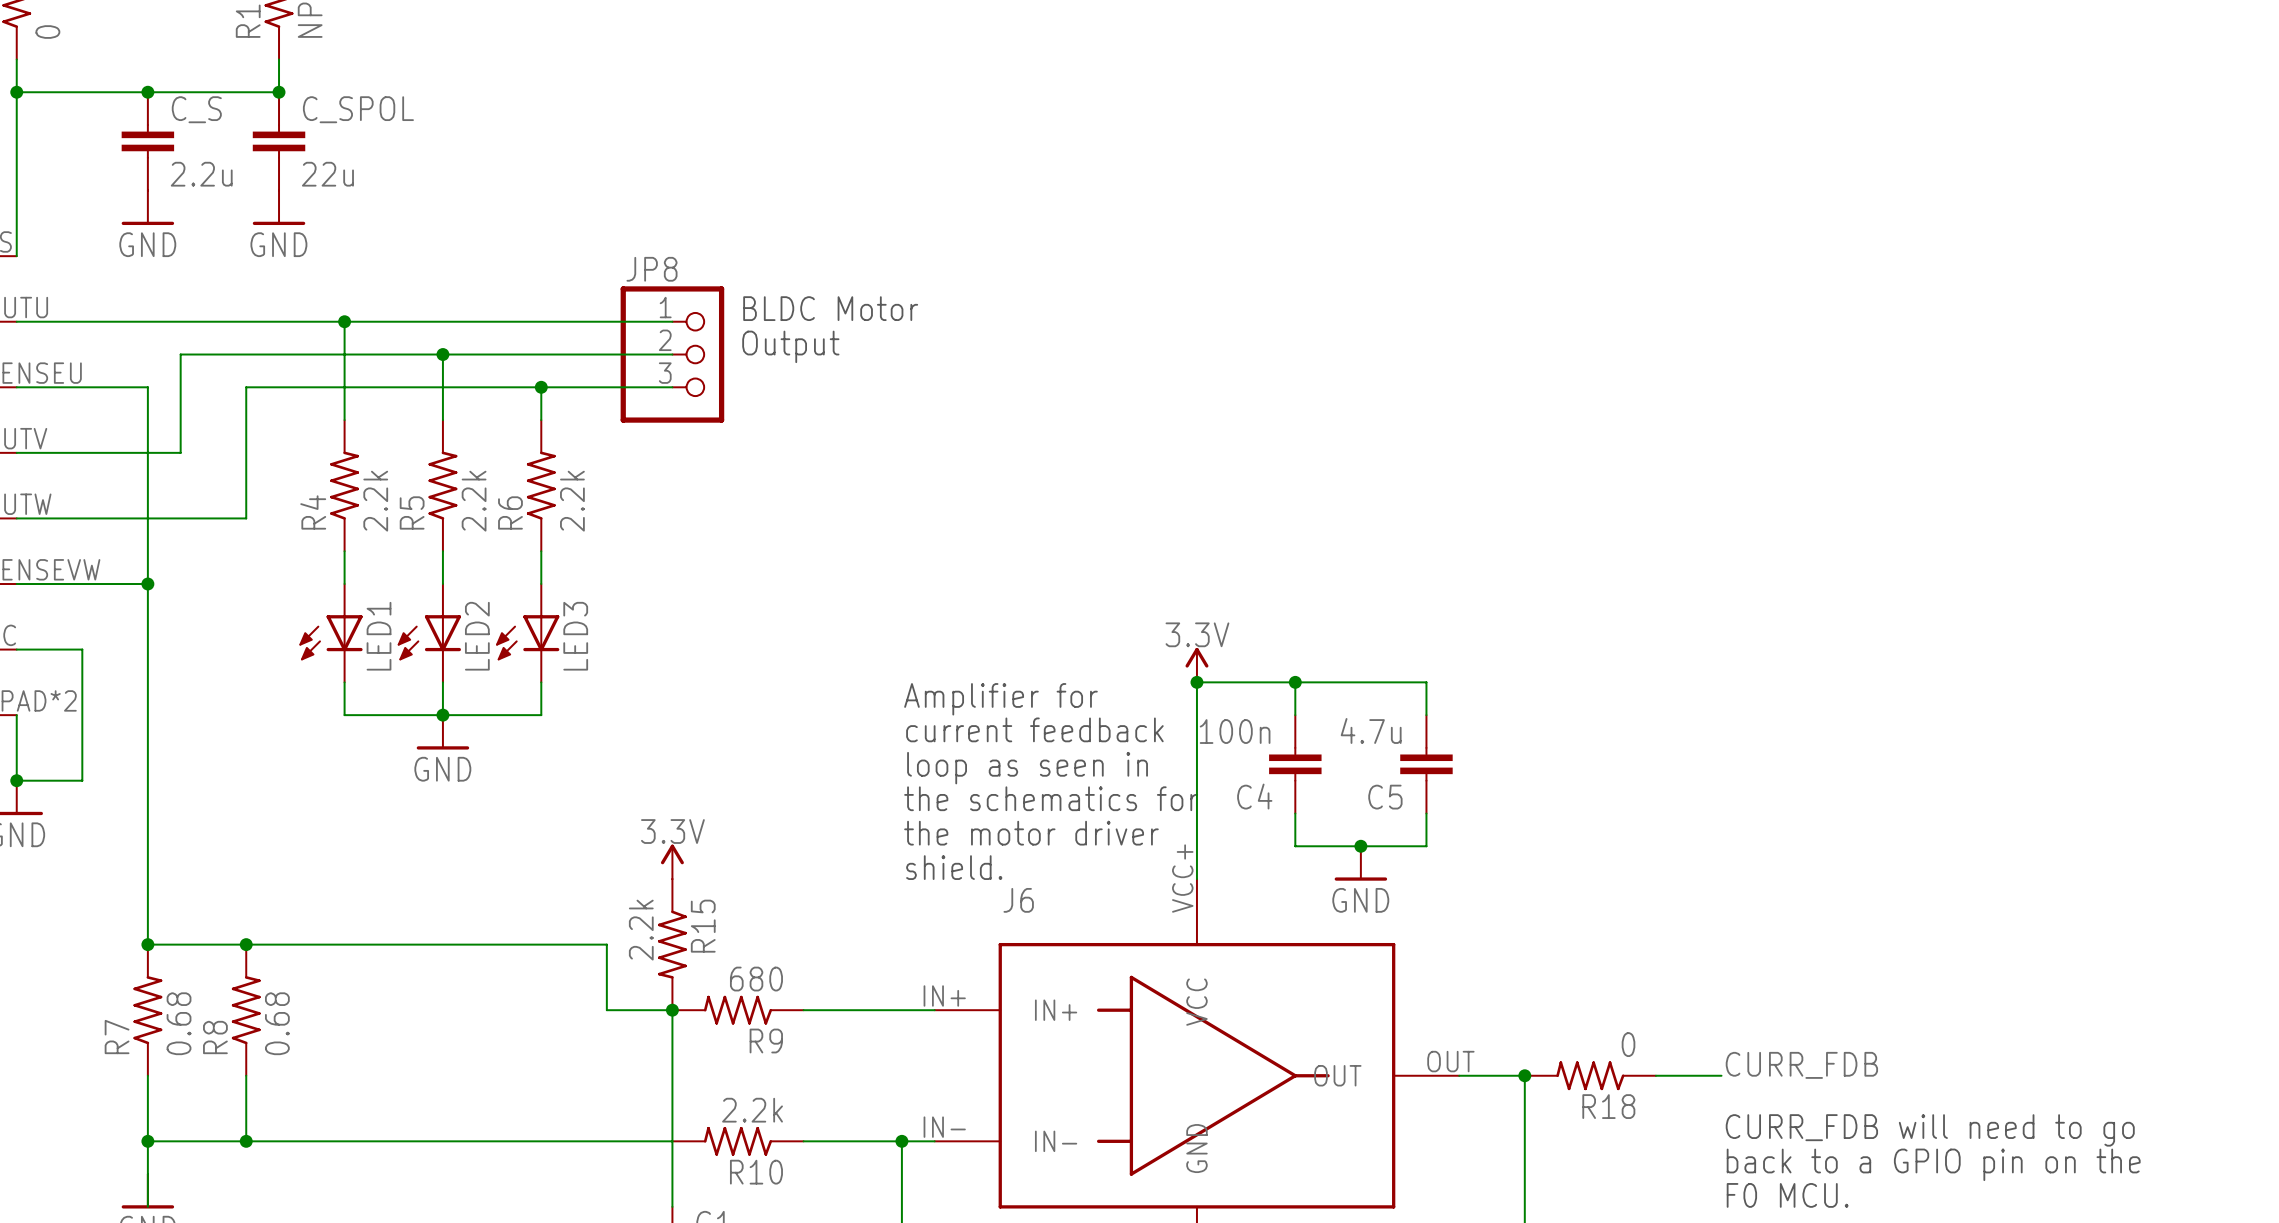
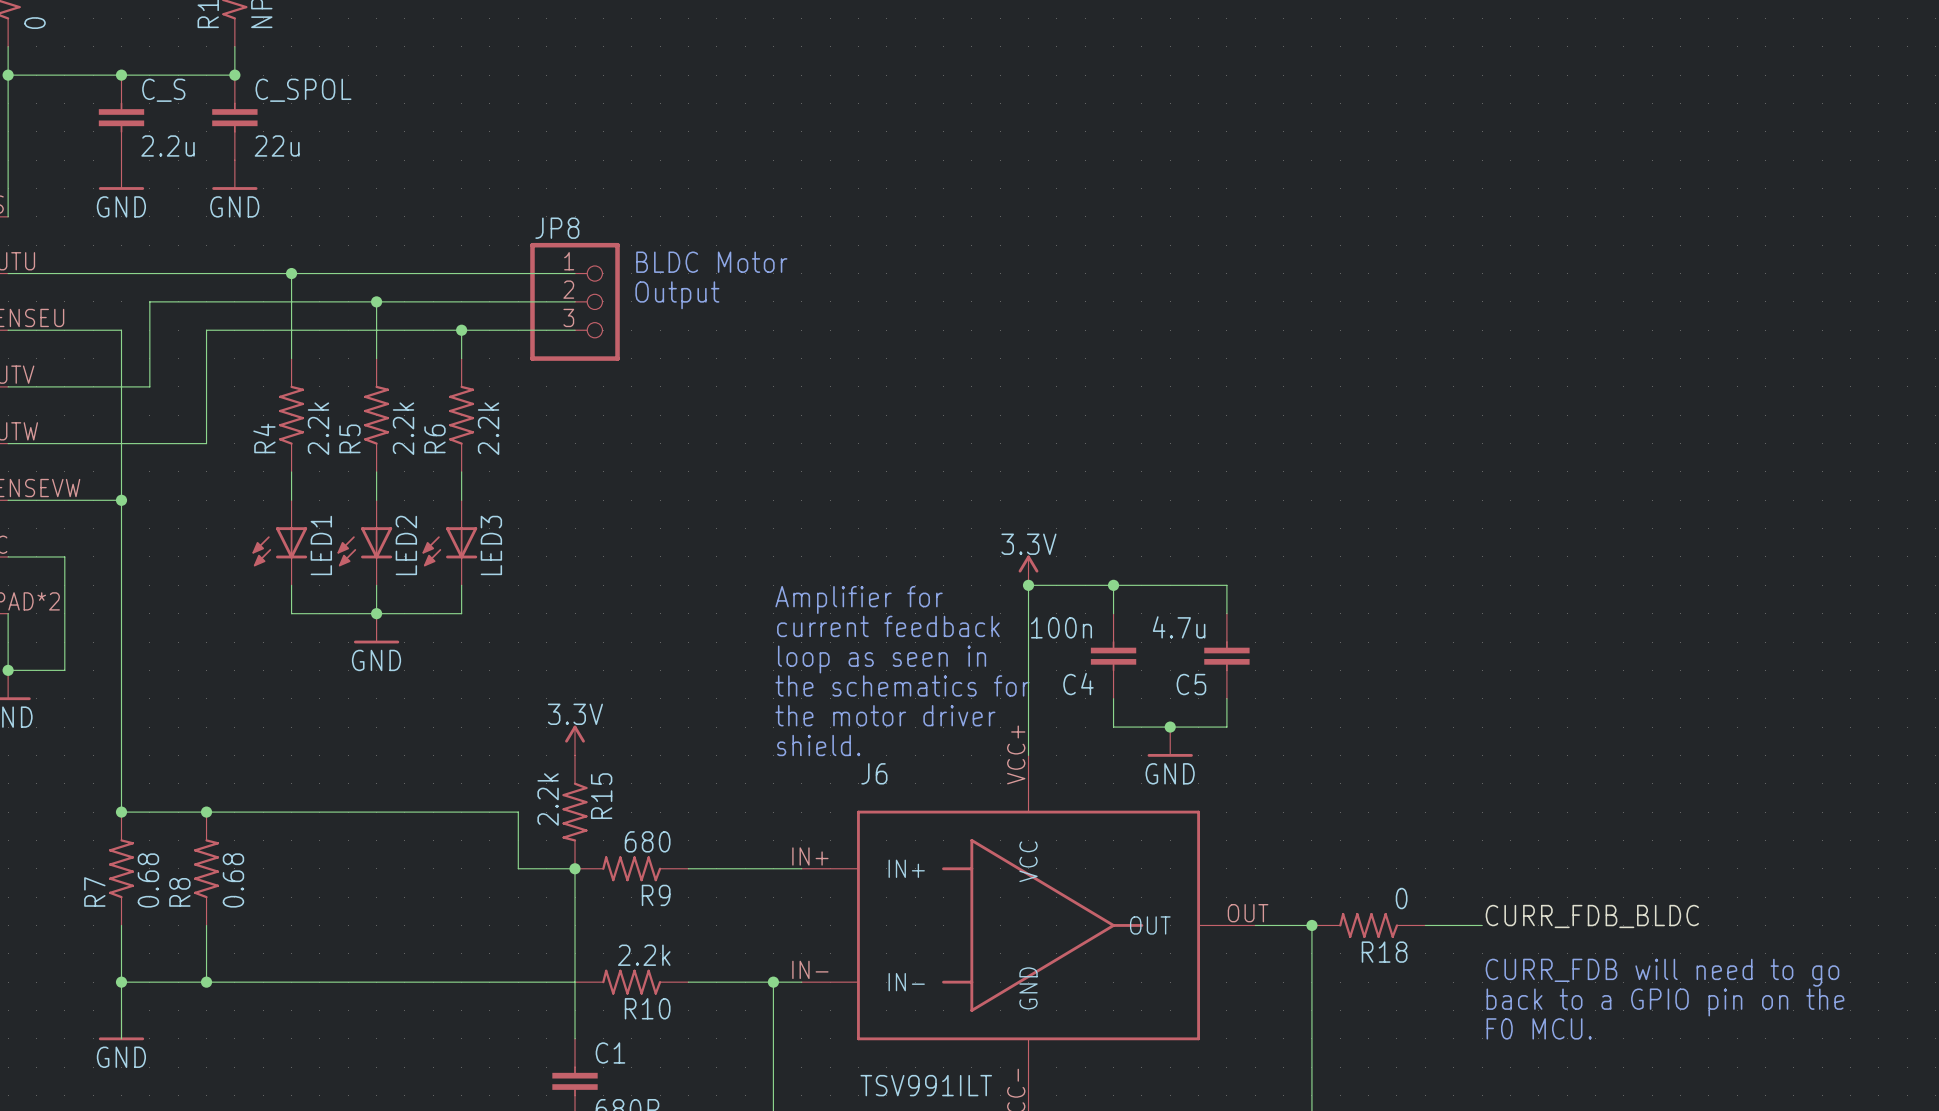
label: CURR_FDB (1801, 1065) -> CURR_FDB_BLDC (1592, 916)

